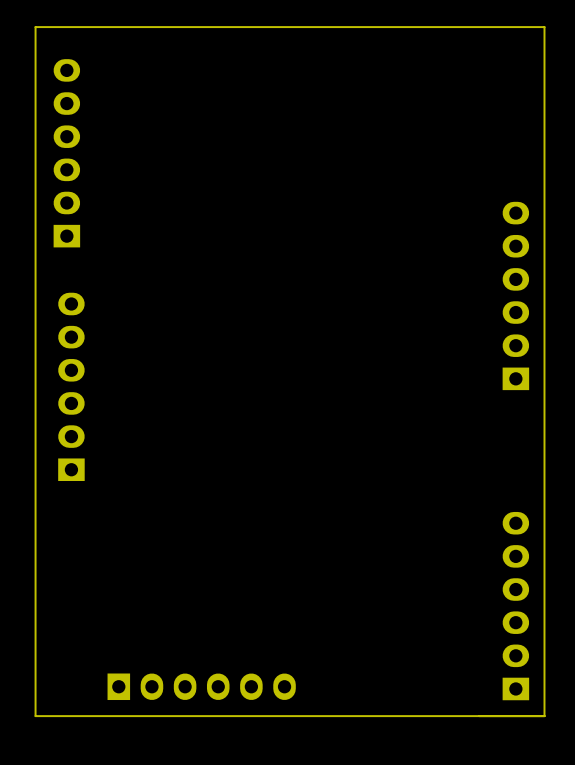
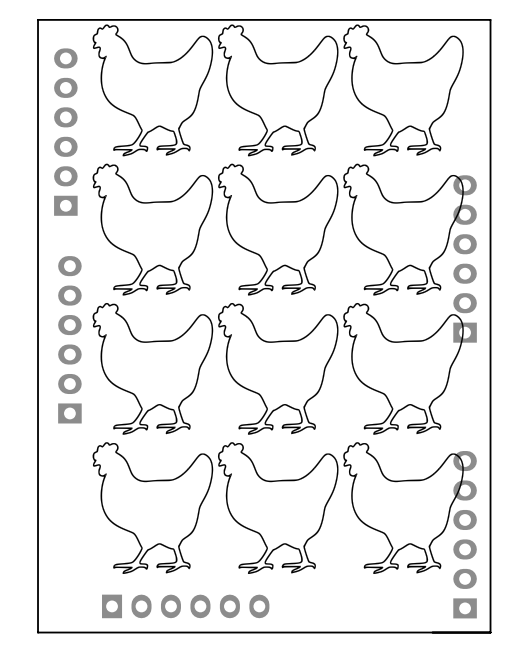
drawing: none -> [92, 24, 464, 575]

